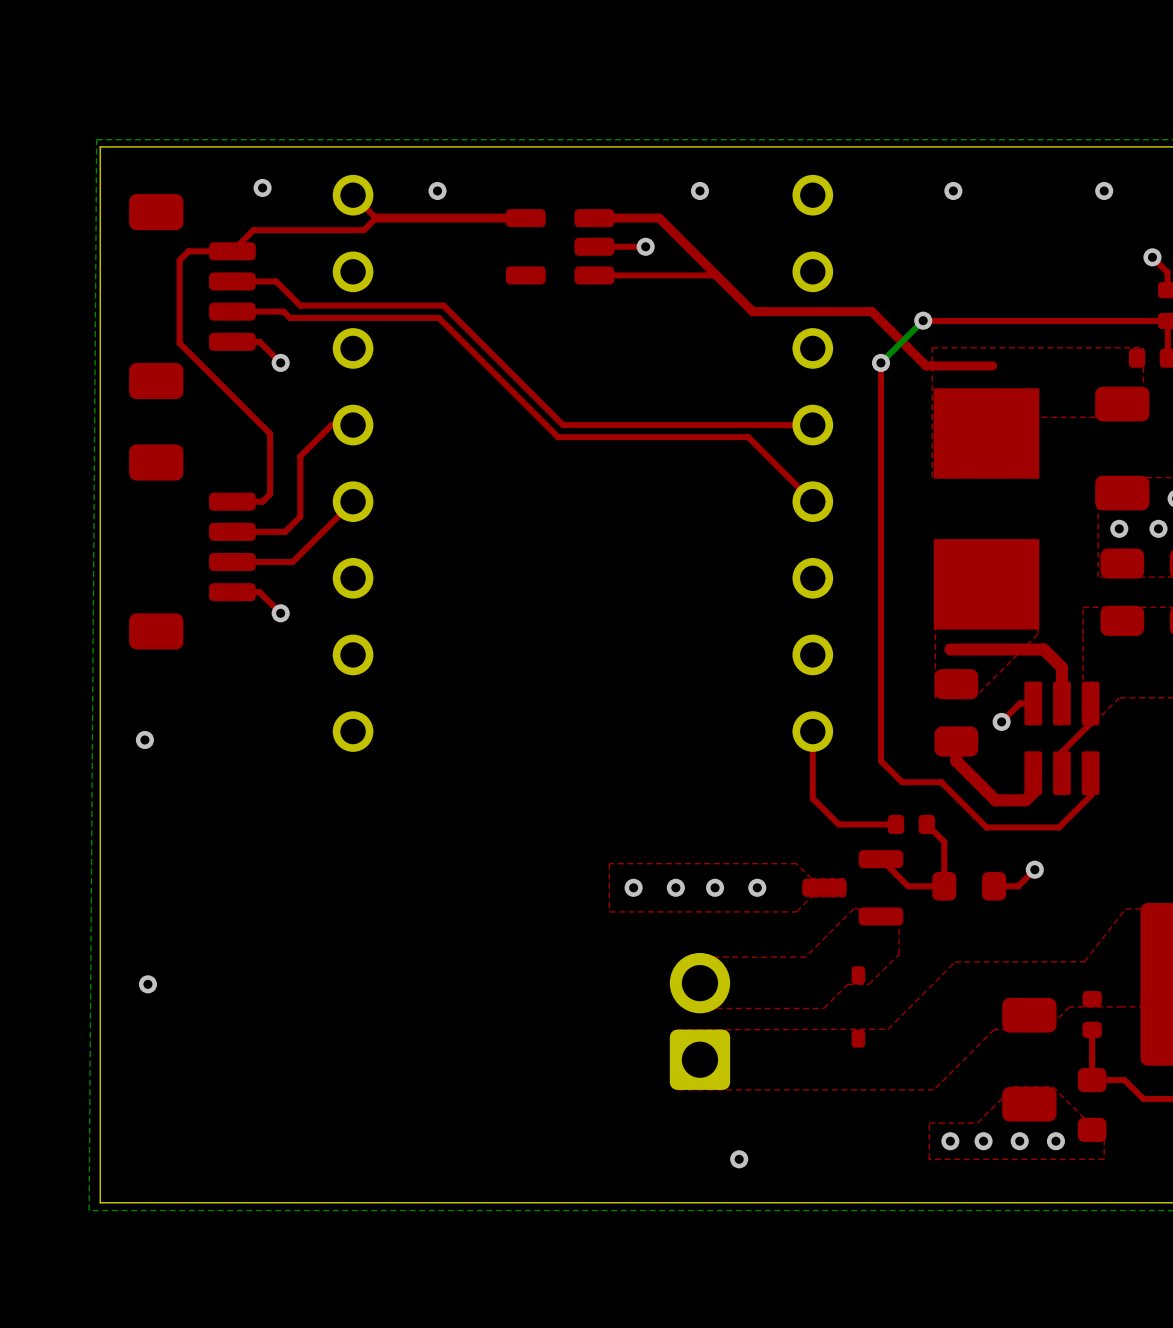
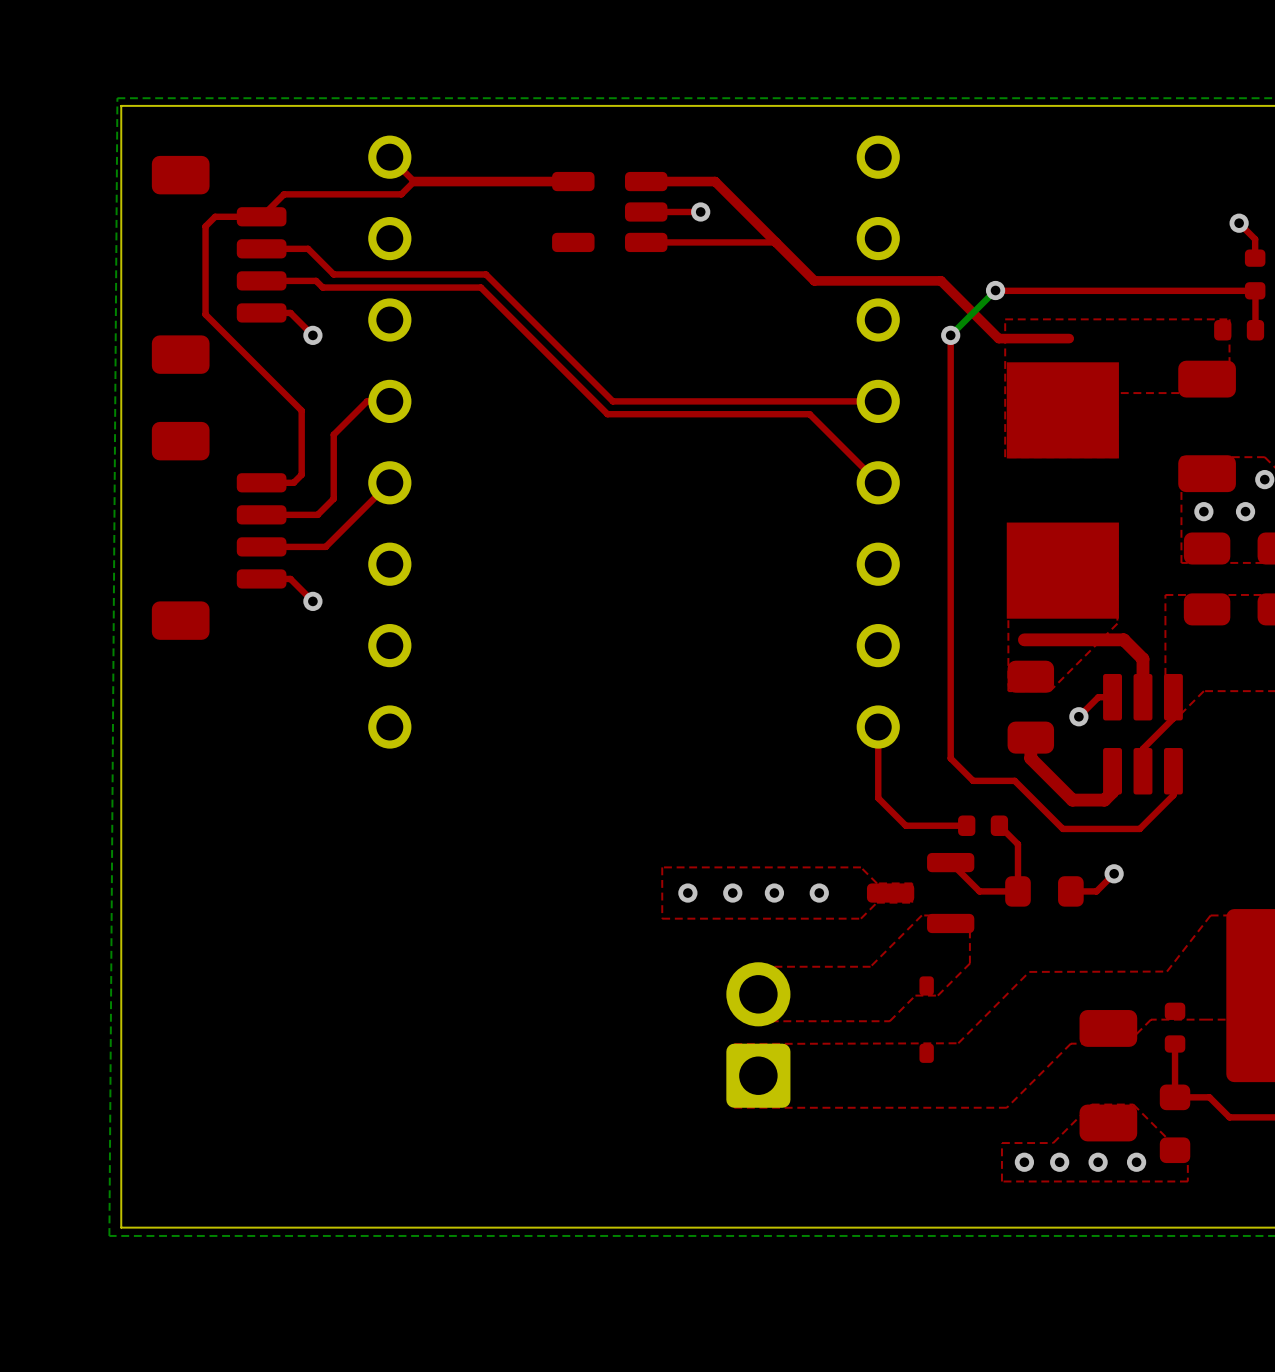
via: (262, 187) -> none
via: (437, 190) -> none
via: (699, 190) -> none
via: (953, 190) -> none
via: (1104, 190) -> none
via: (144, 739) -> none
via: (147, 984) -> none
via: (739, 1159) -> none

